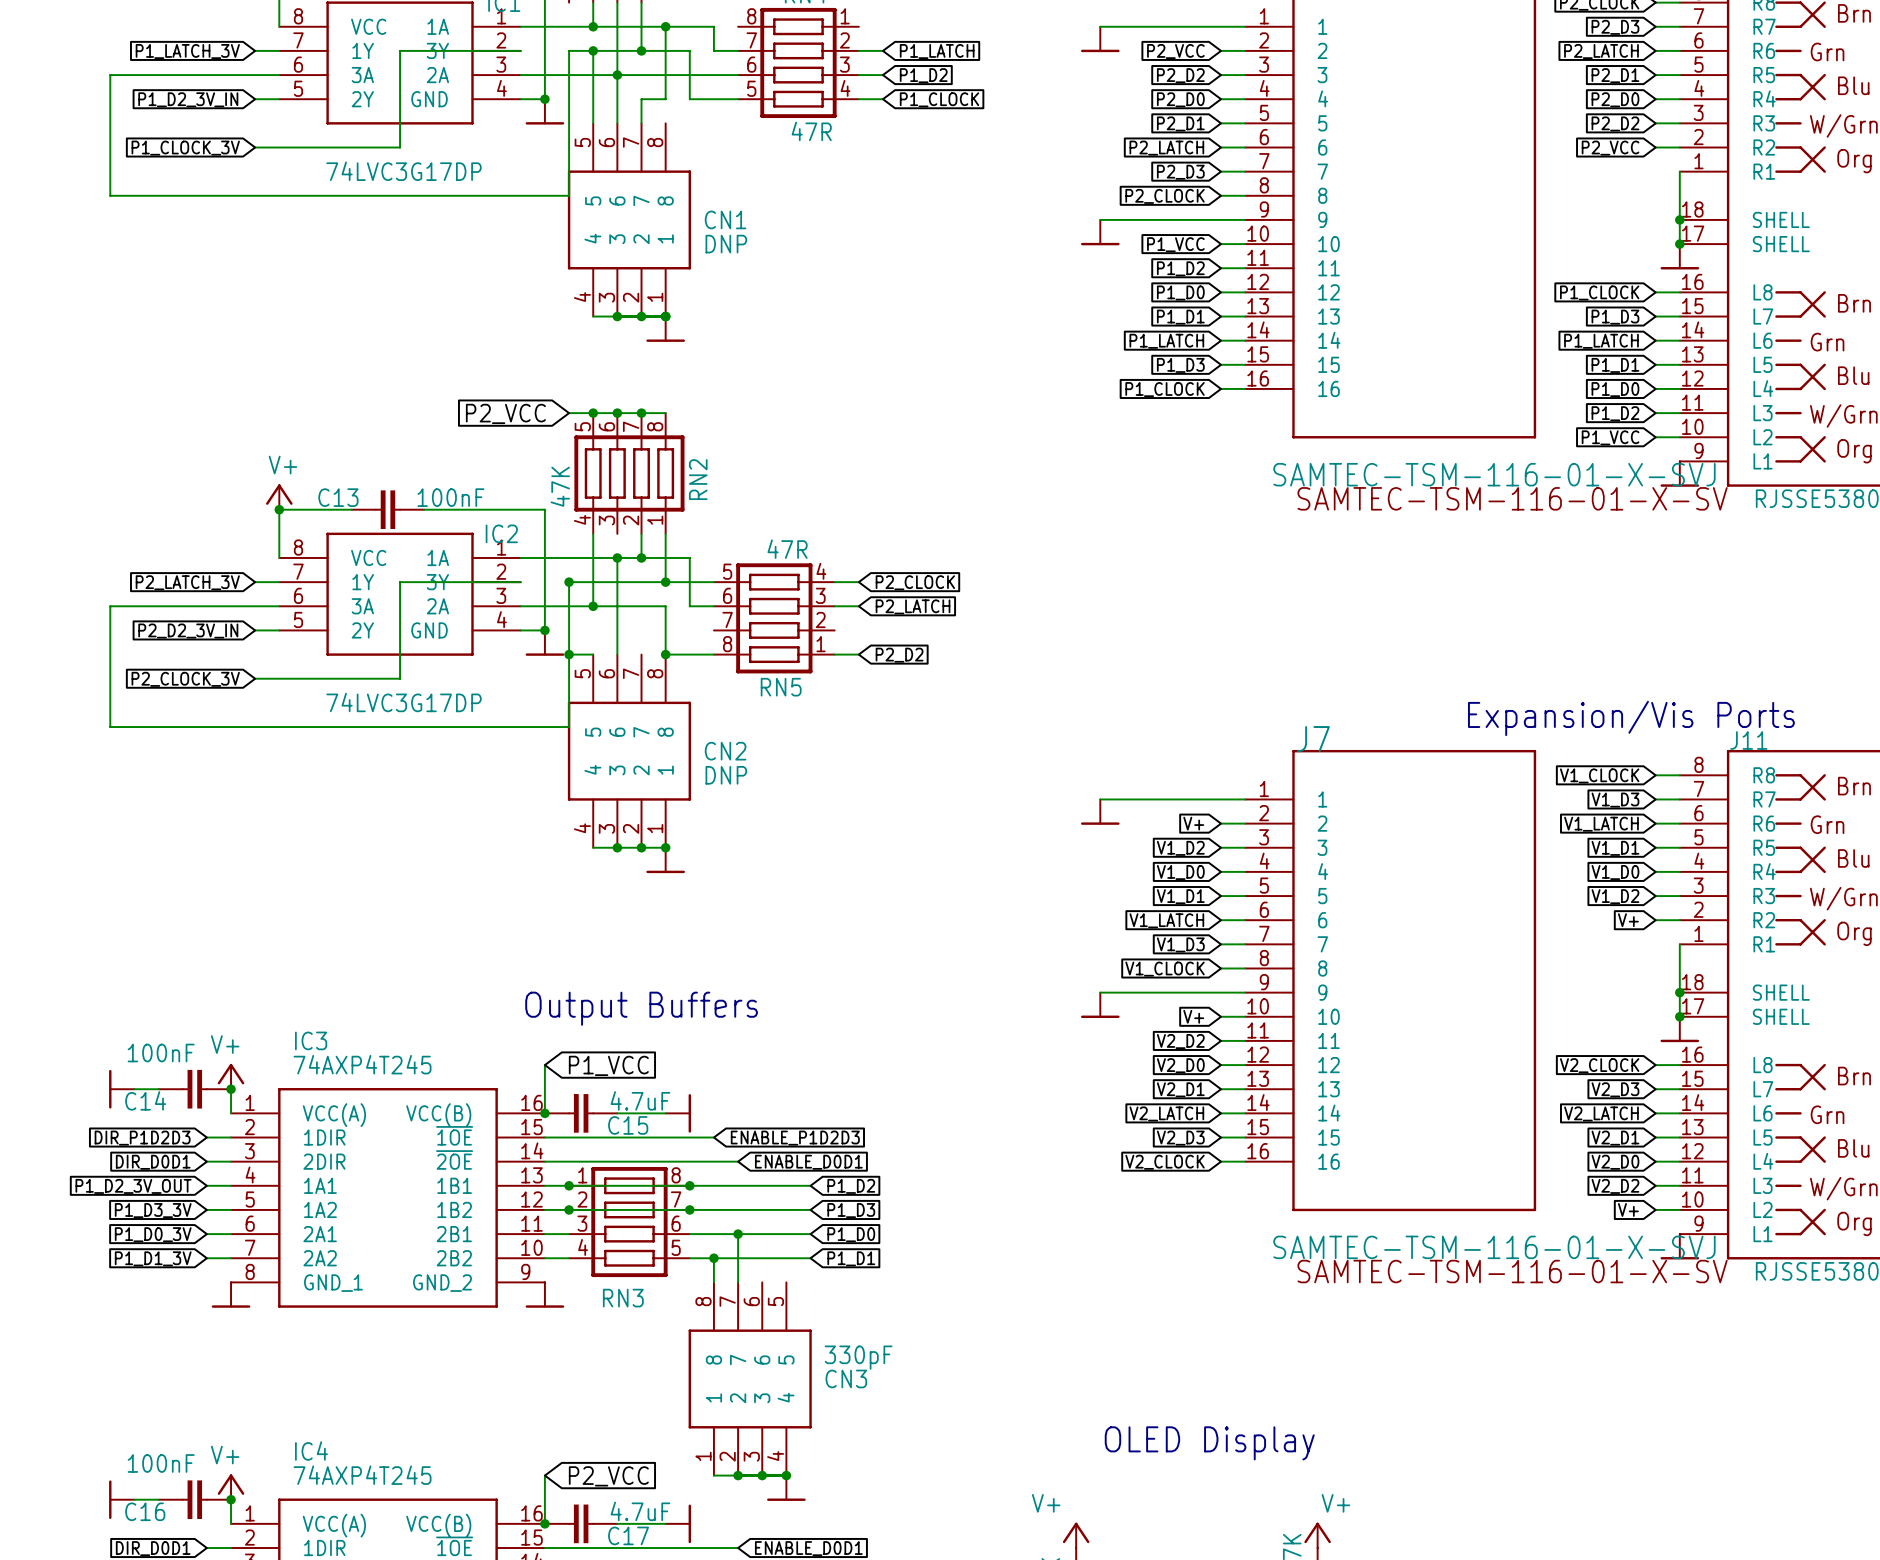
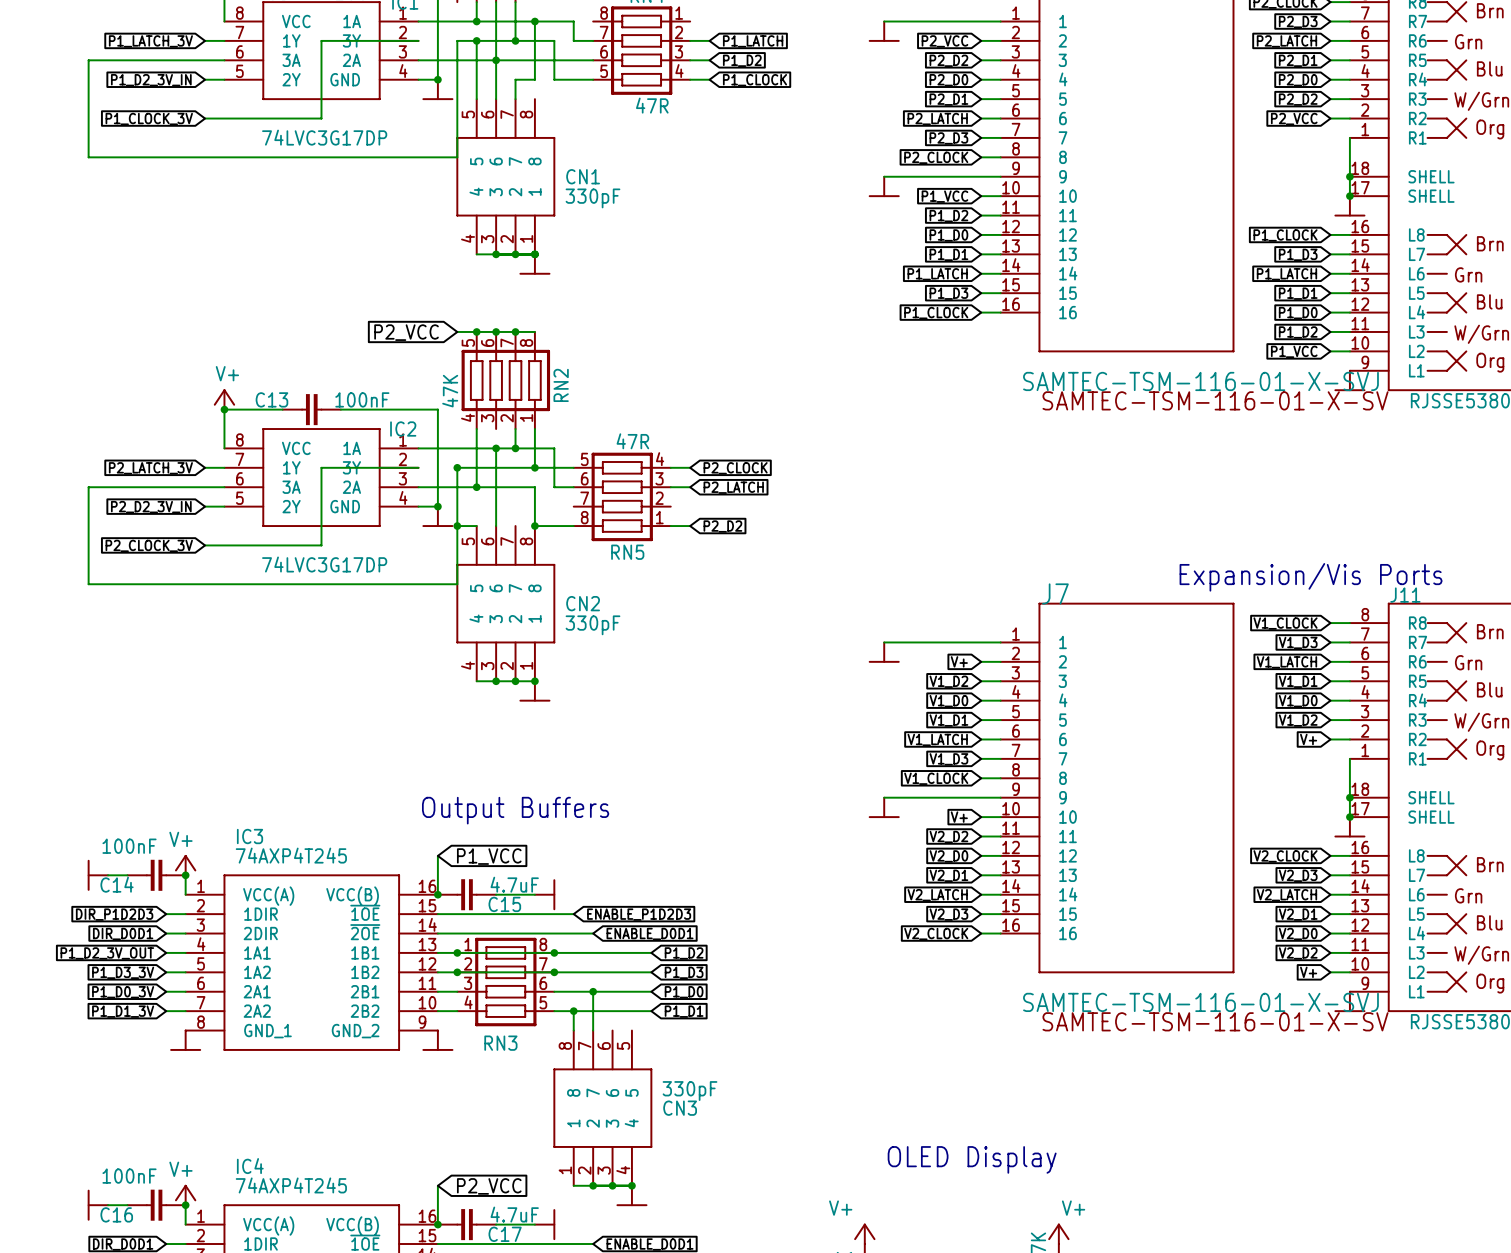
CN1 value: DNP (726, 244) -> 330pF (592, 198)
CN2 value: DNP (726, 775) -> 330pF (592, 625)

